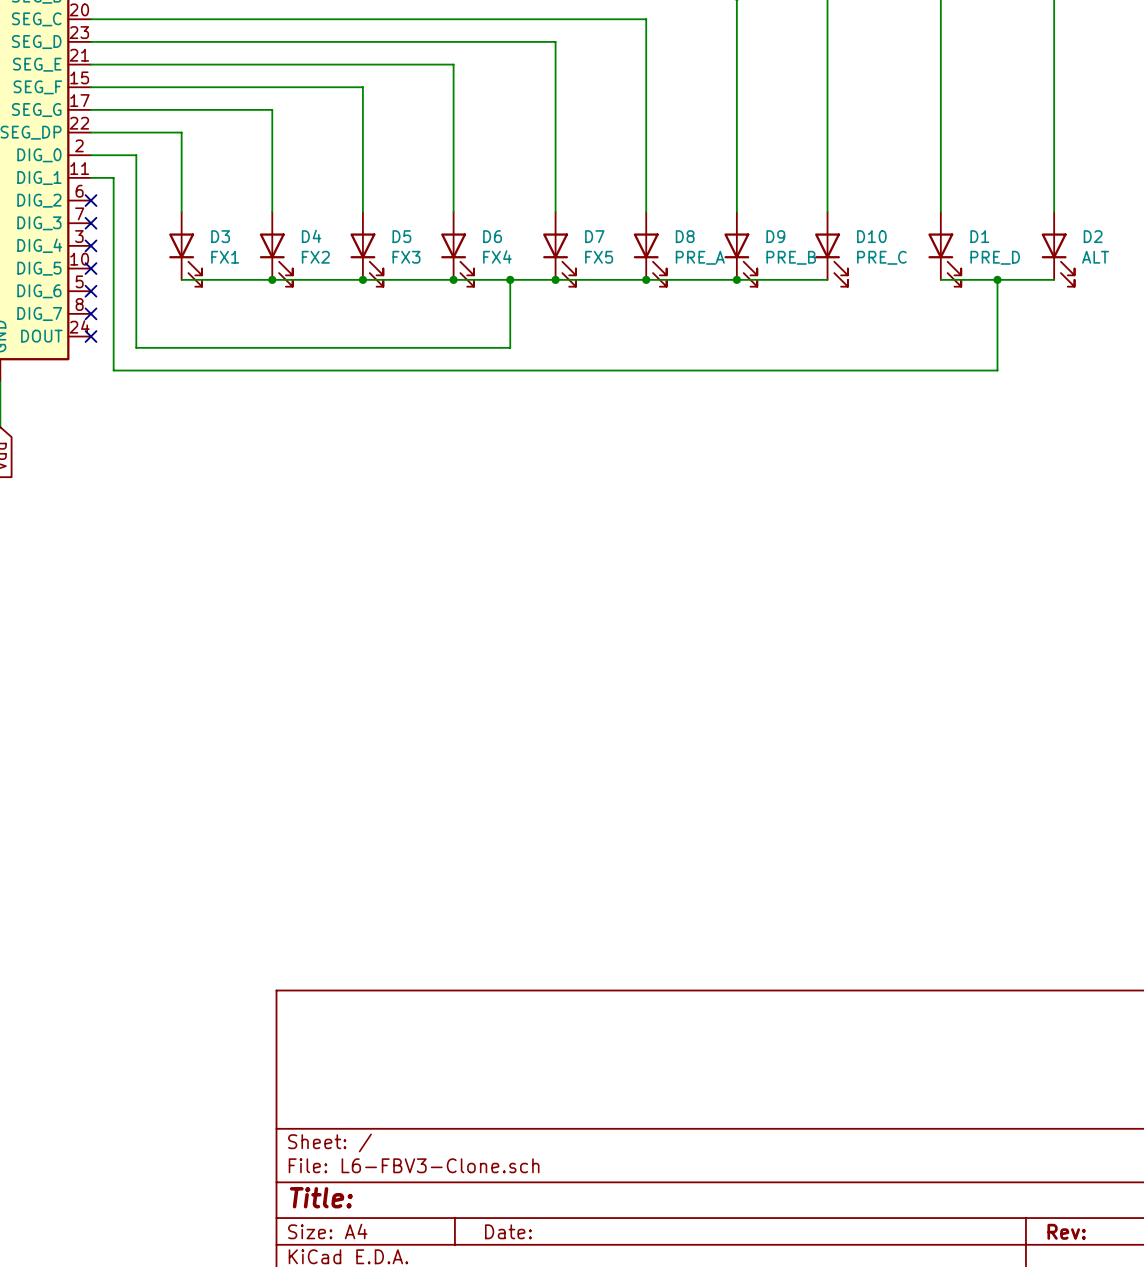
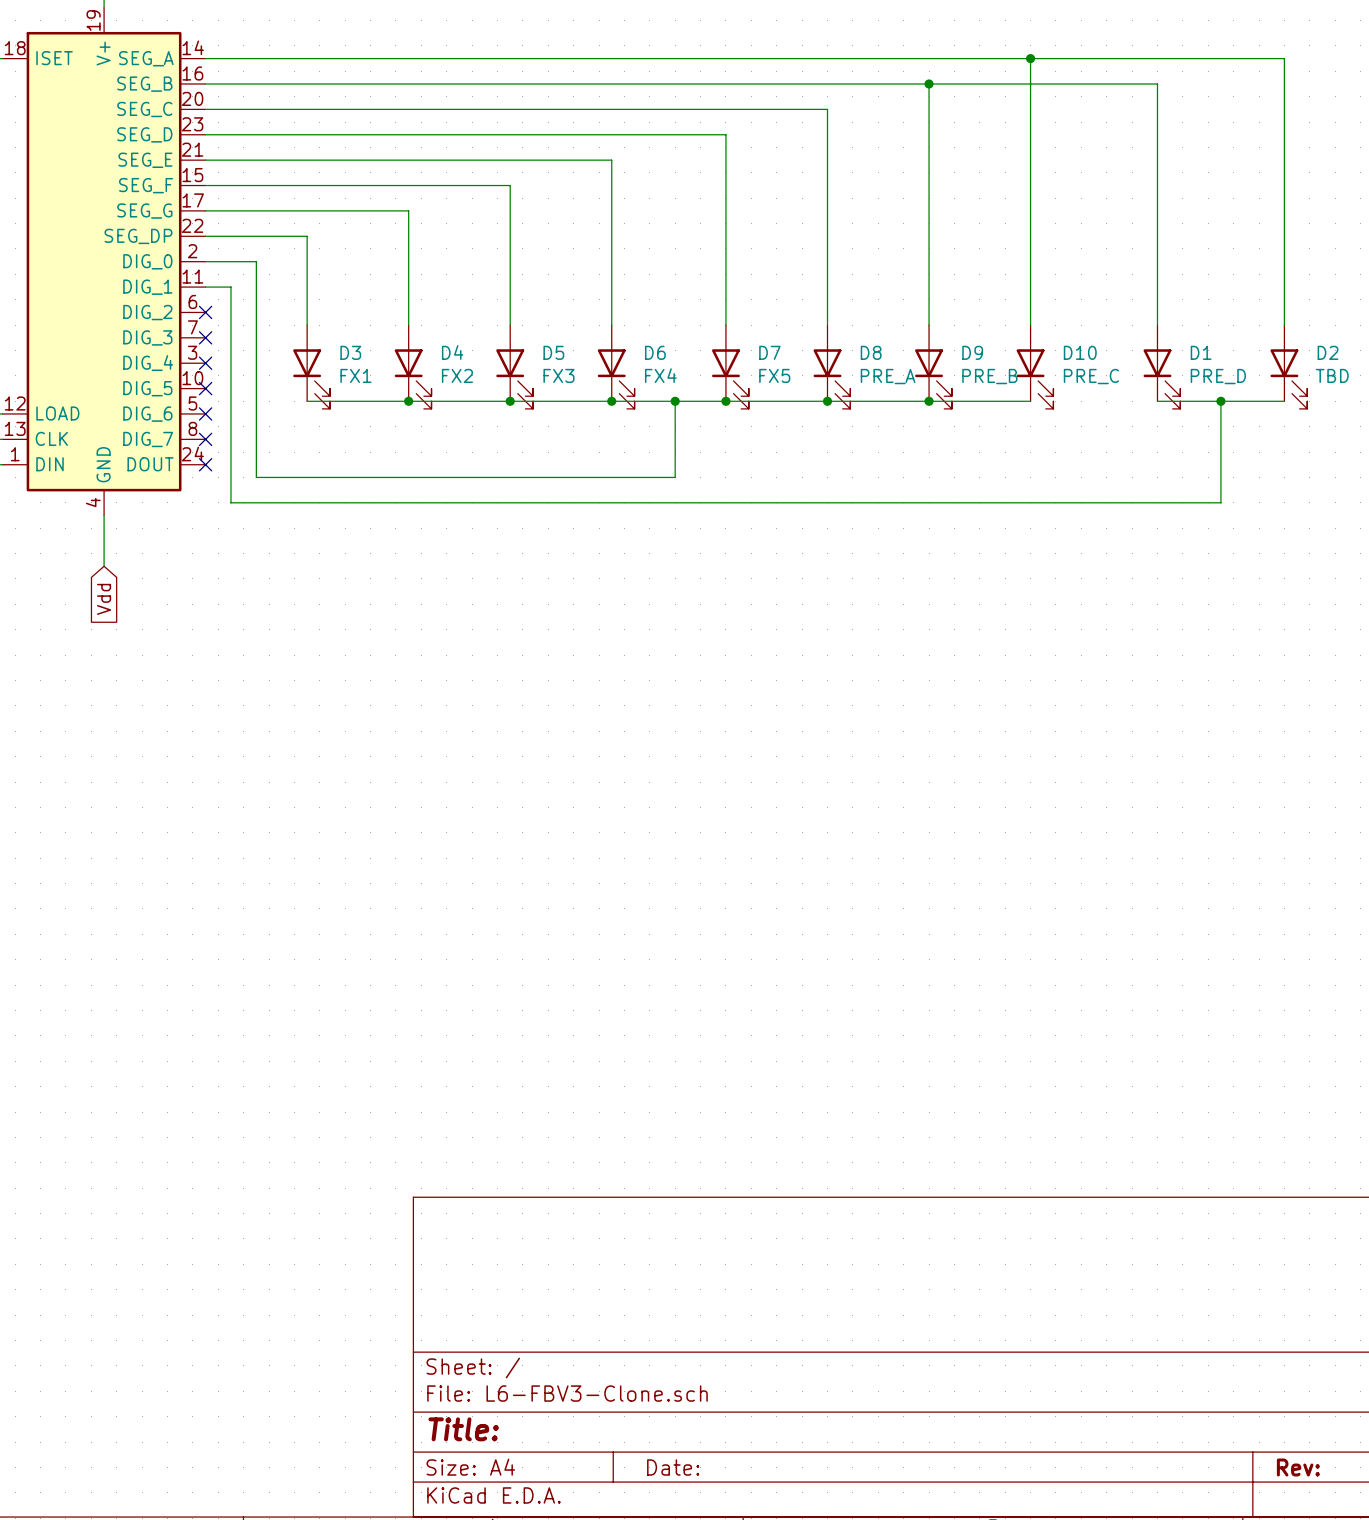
D2 value: ALT (1095, 257) -> TBD (1332, 375)

